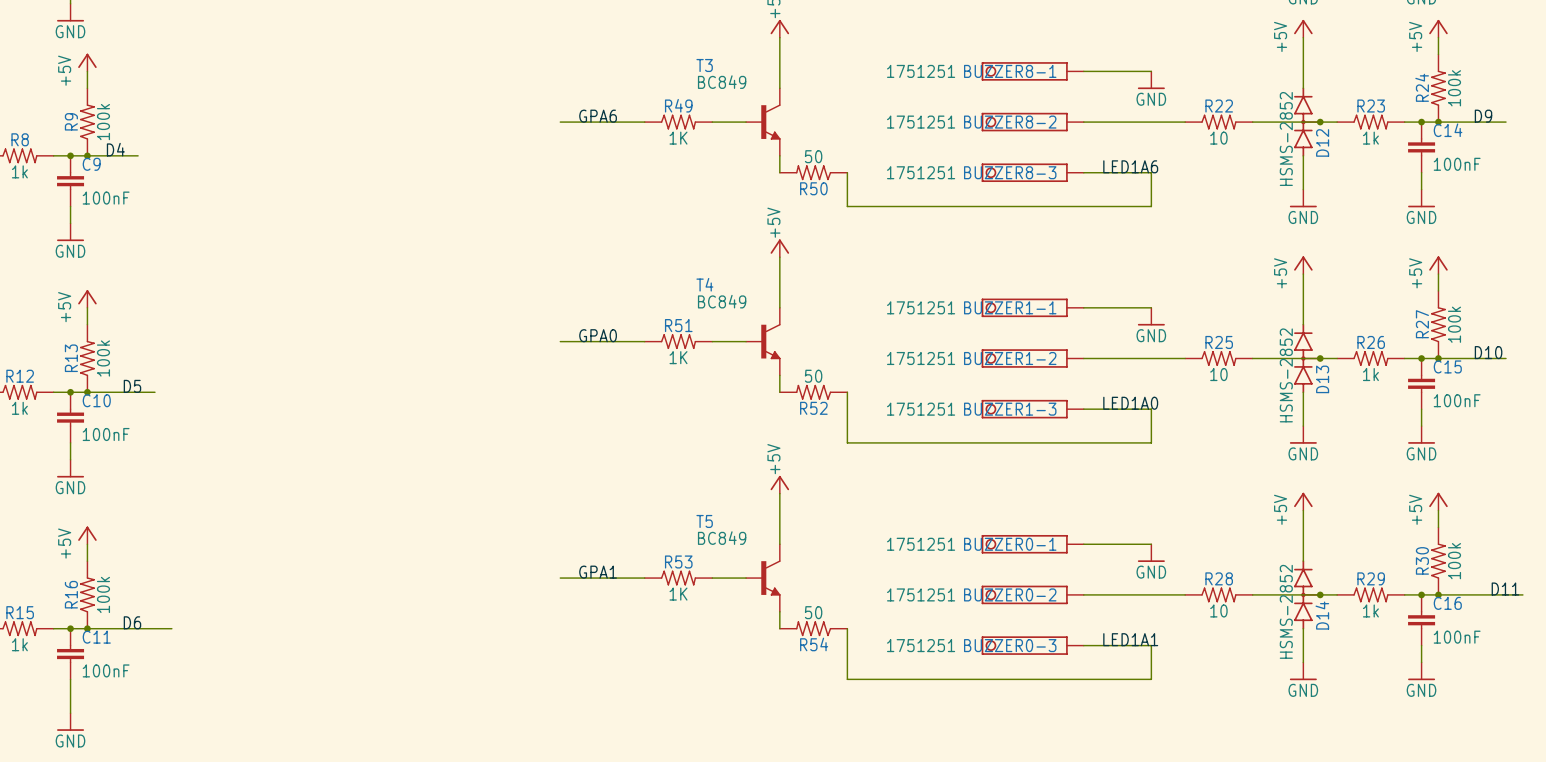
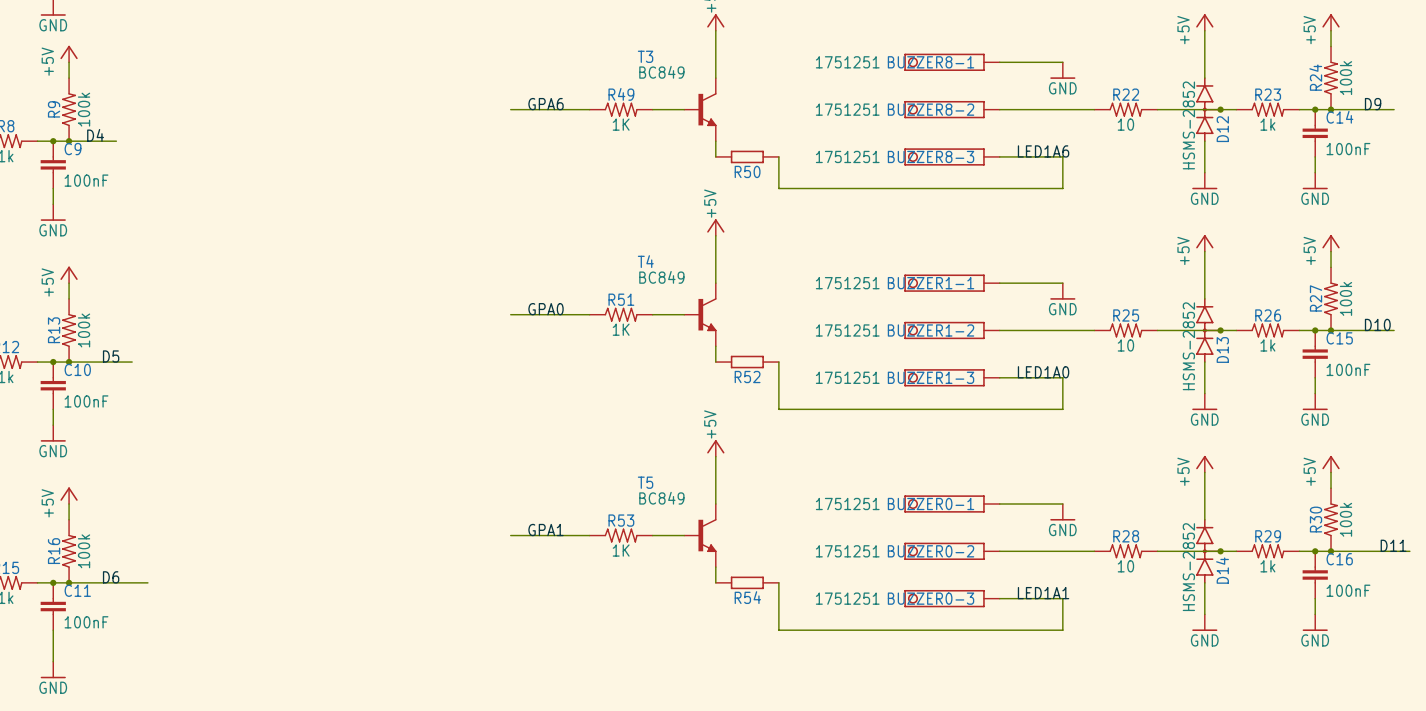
R50 value: 50 (813, 156) -> none
R50 symbol: [779, 165, 848, 180] -> [715, 150, 779, 164]
R52 value: 50 (813, 376) -> none
R52 symbol: [779, 385, 848, 400] -> [715, 355, 779, 369]
R54 value: 50 (813, 612) -> none
R54 symbol: [779, 621, 848, 636] -> [715, 576, 779, 590]

